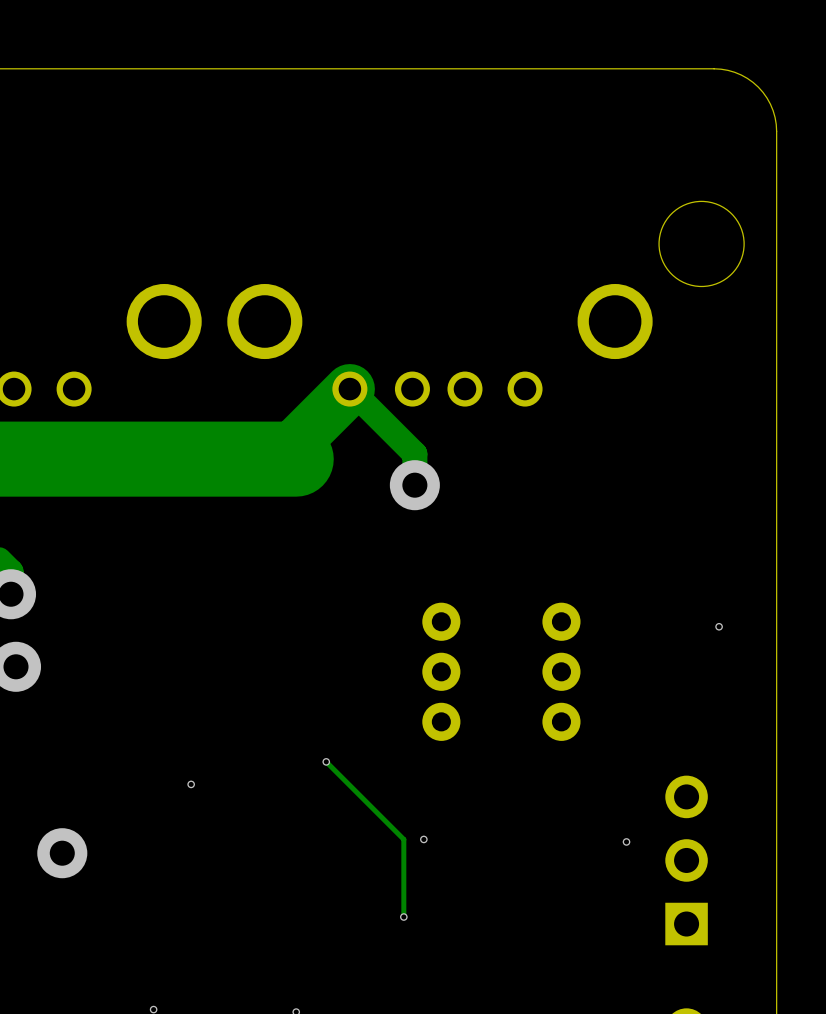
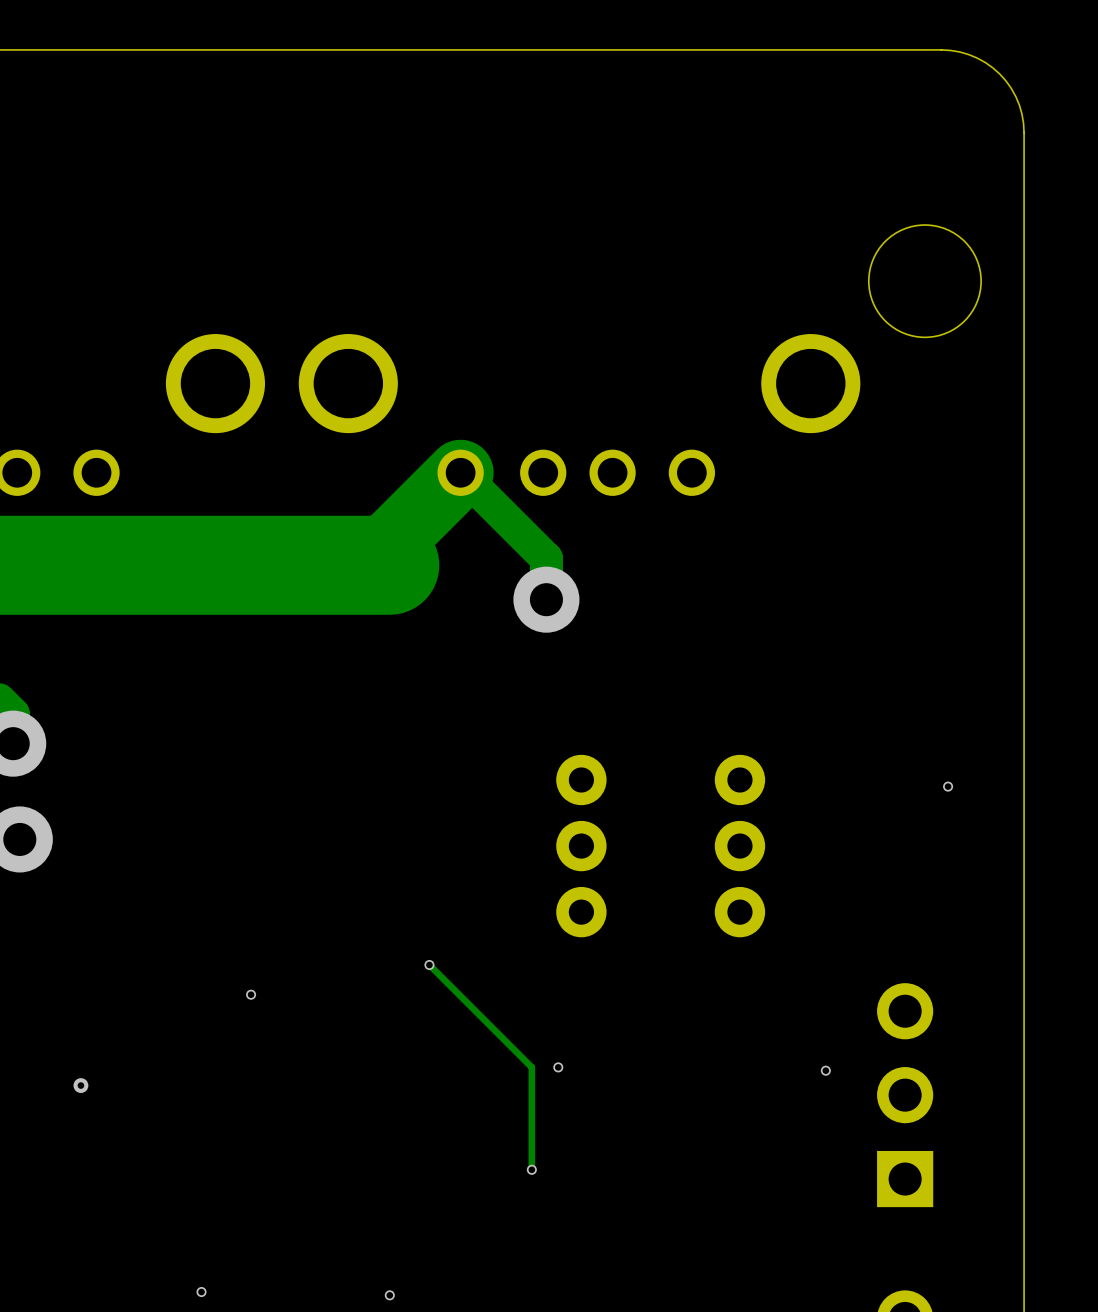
via size: [37, 828, 88, 879] -> [73, 1078, 89, 1093]

